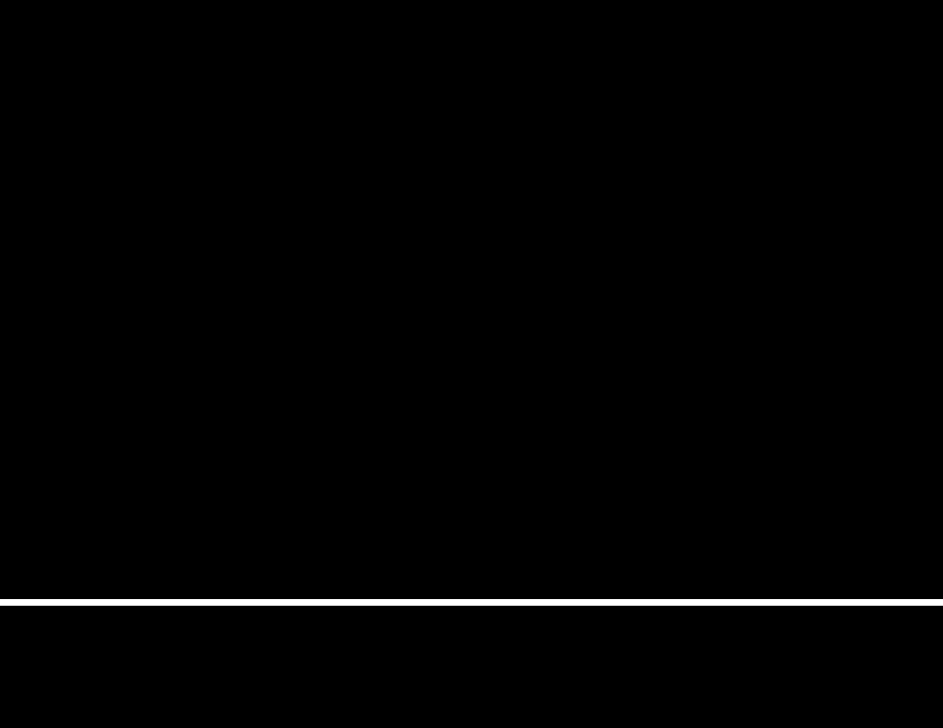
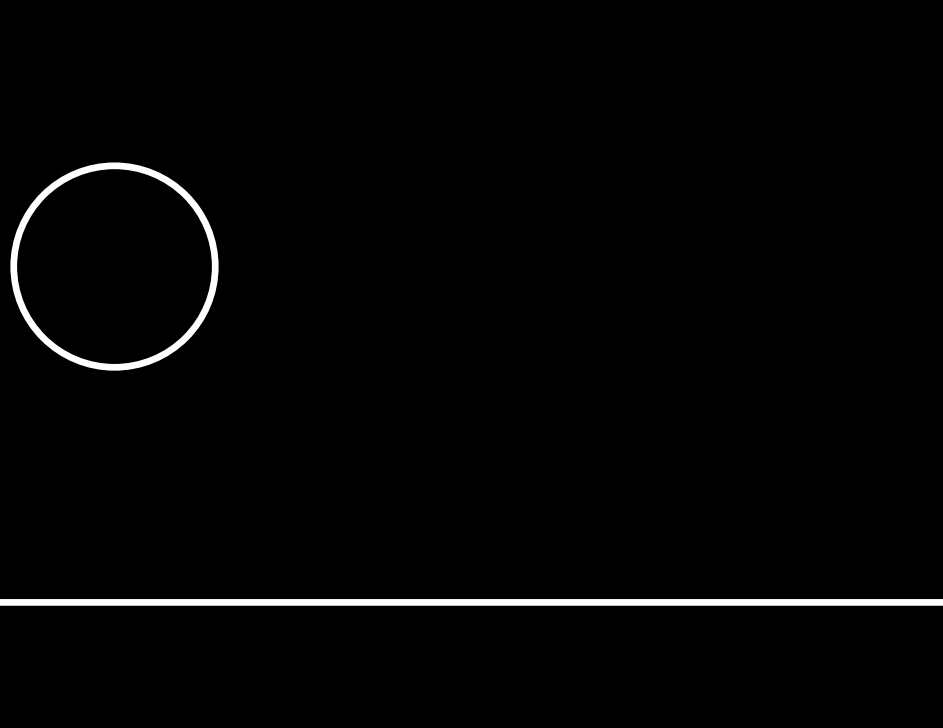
round board edge: none -> [10, 162, 219, 371]

